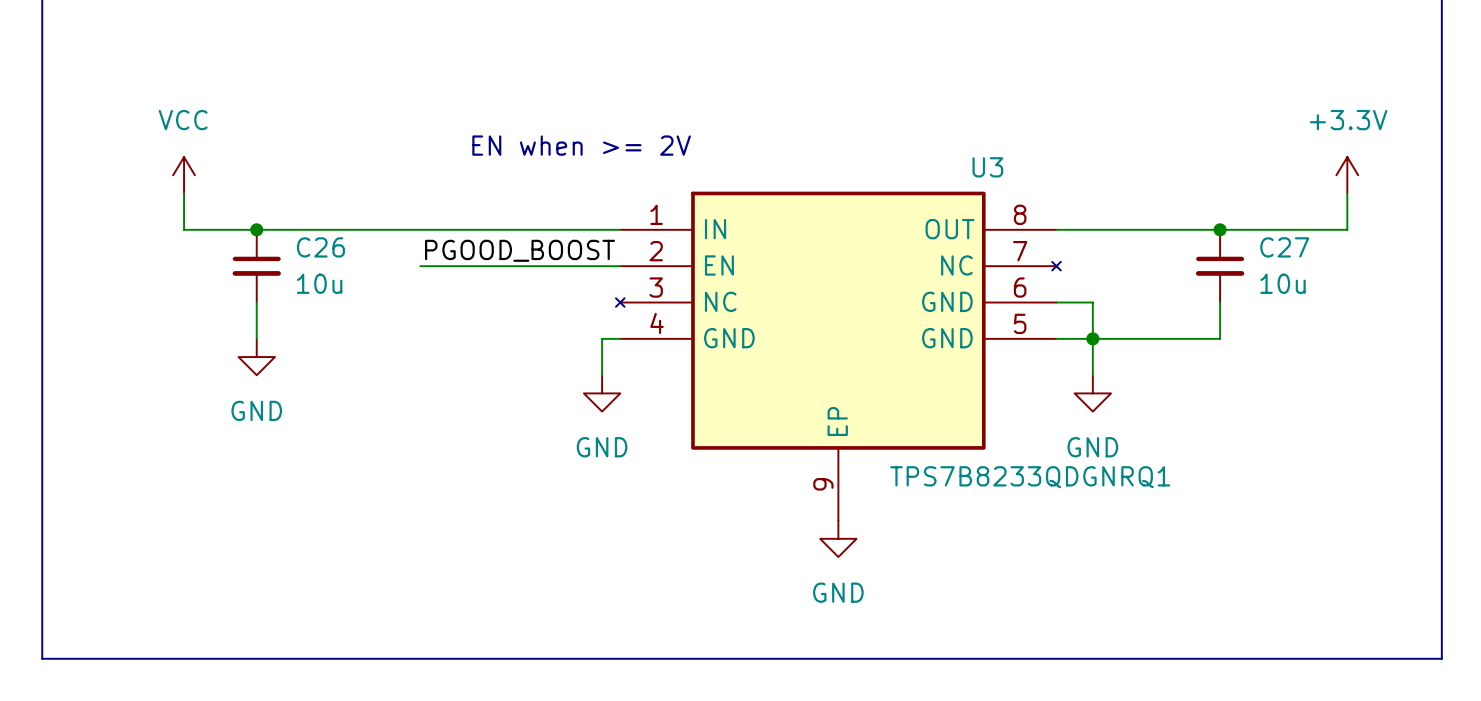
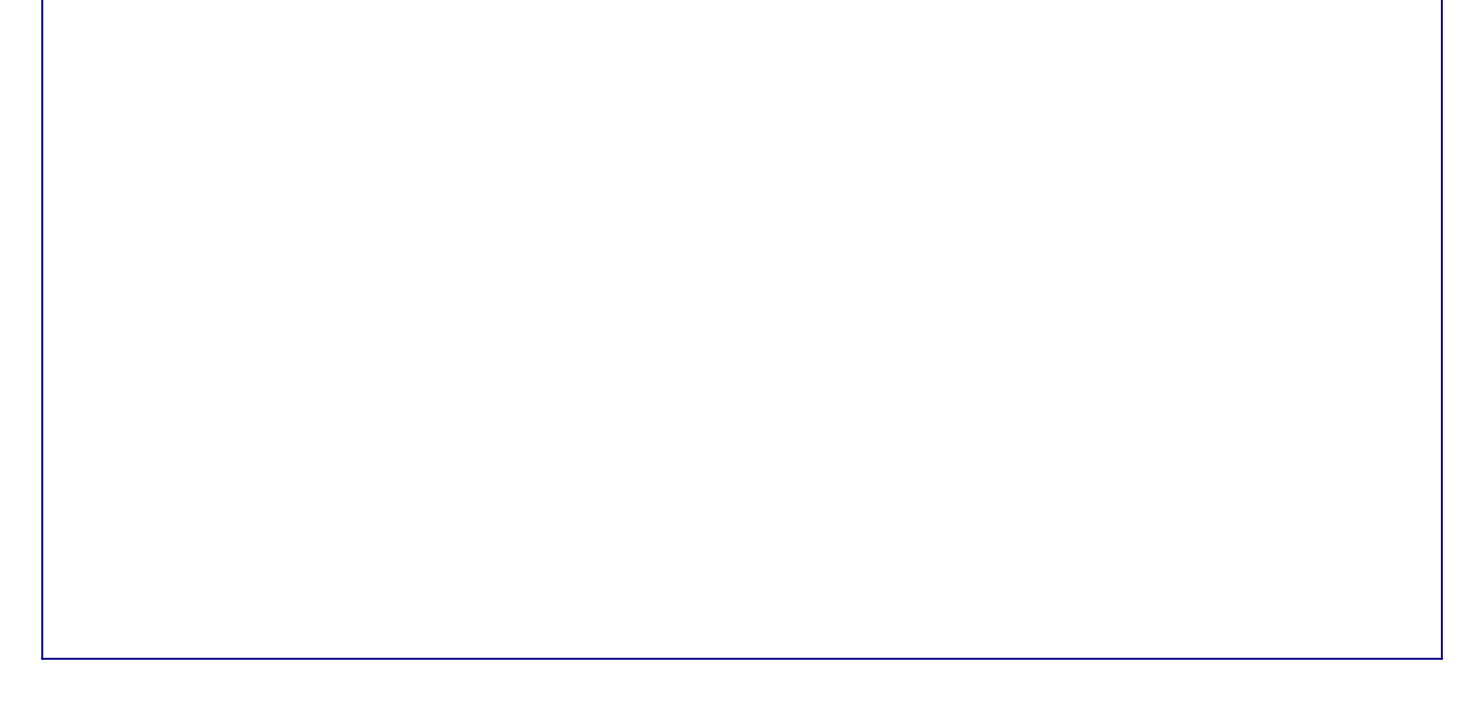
text: EN when >= 2V (581, 145) -> none
power symbol: VCC (184, 175) -> none
power symbol: +3.3V (1347, 175) -> none
wire: (184, 193) (184, 229) (620, 229) -> none
wire: (1347, 193) (1347, 229) (1056, 229) -> none
junction: (256, 229) -> none
junction: (1220, 229) -> none
label: PGOOD_BOOST (520, 250) -> none
C26: 10u (256, 266) -> none
wire: (420, 266) (620, 266) -> none
C27: 10u (1220, 266) -> none
wire: (256, 302) (256, 338) -> none
wire: (1056, 302) (1092, 302) (1092, 375) -> none
wire: (1220, 302) (1220, 338) (1056, 338) -> none
wire: (620, 338) (602, 338) (602, 375) -> none
junction: (1092, 338) -> none
U3: TPS7B8233QDGNRQ1 (838, 356) -> none
power symbol: GND (256, 357) -> none
power symbol: GND (602, 393) -> none
power symbol: GND (1092, 393) -> none
power symbol: GND (838, 538) -> none

